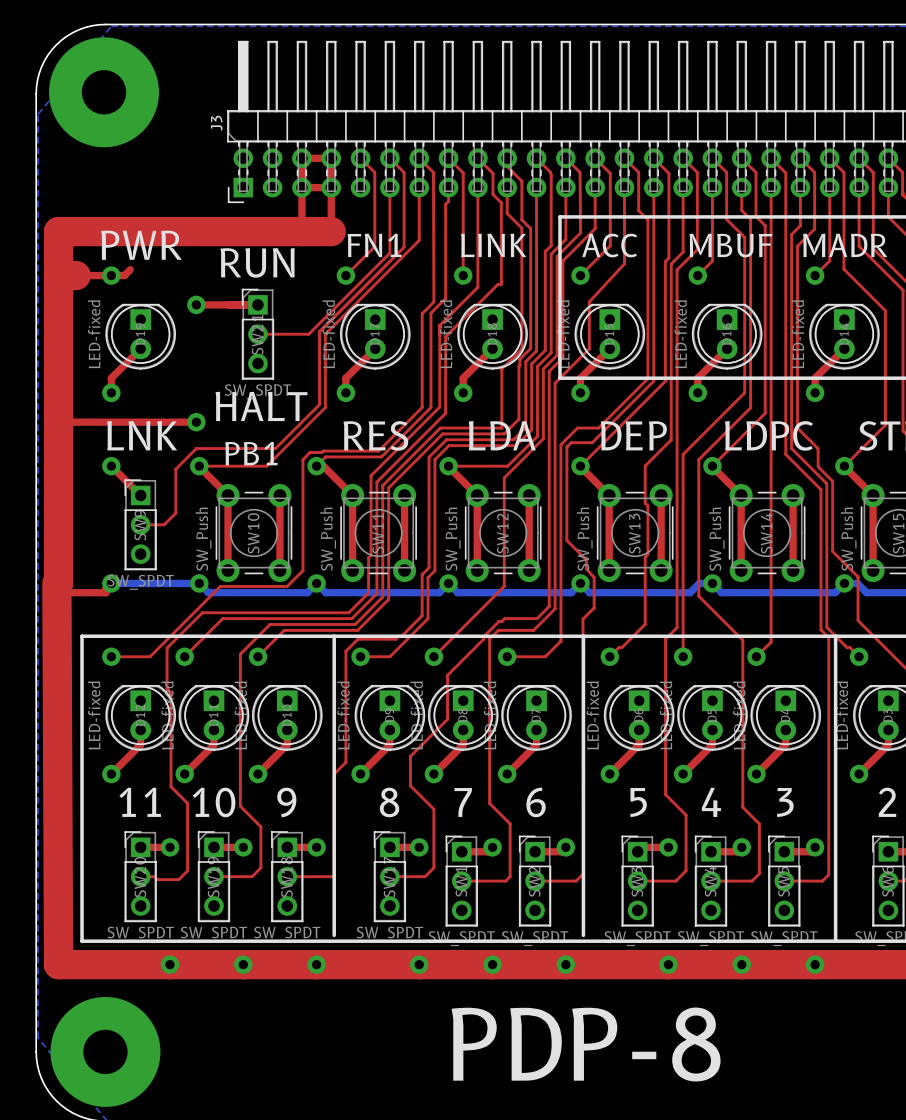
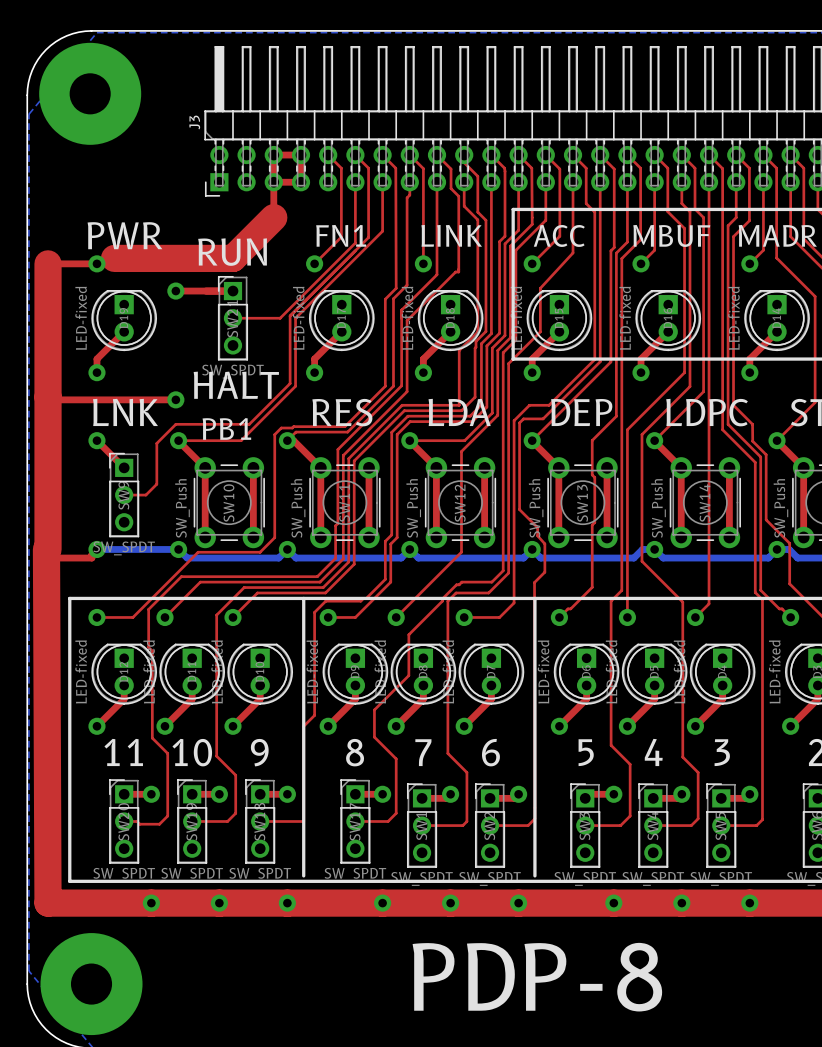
top track: (331, 187) (331, 231) (58, 231) (58, 275) (76, 275) -> none
top track: none -> (273, 217) (232, 258) (114, 258)
line: (835, 636) (835, 941) -> none

